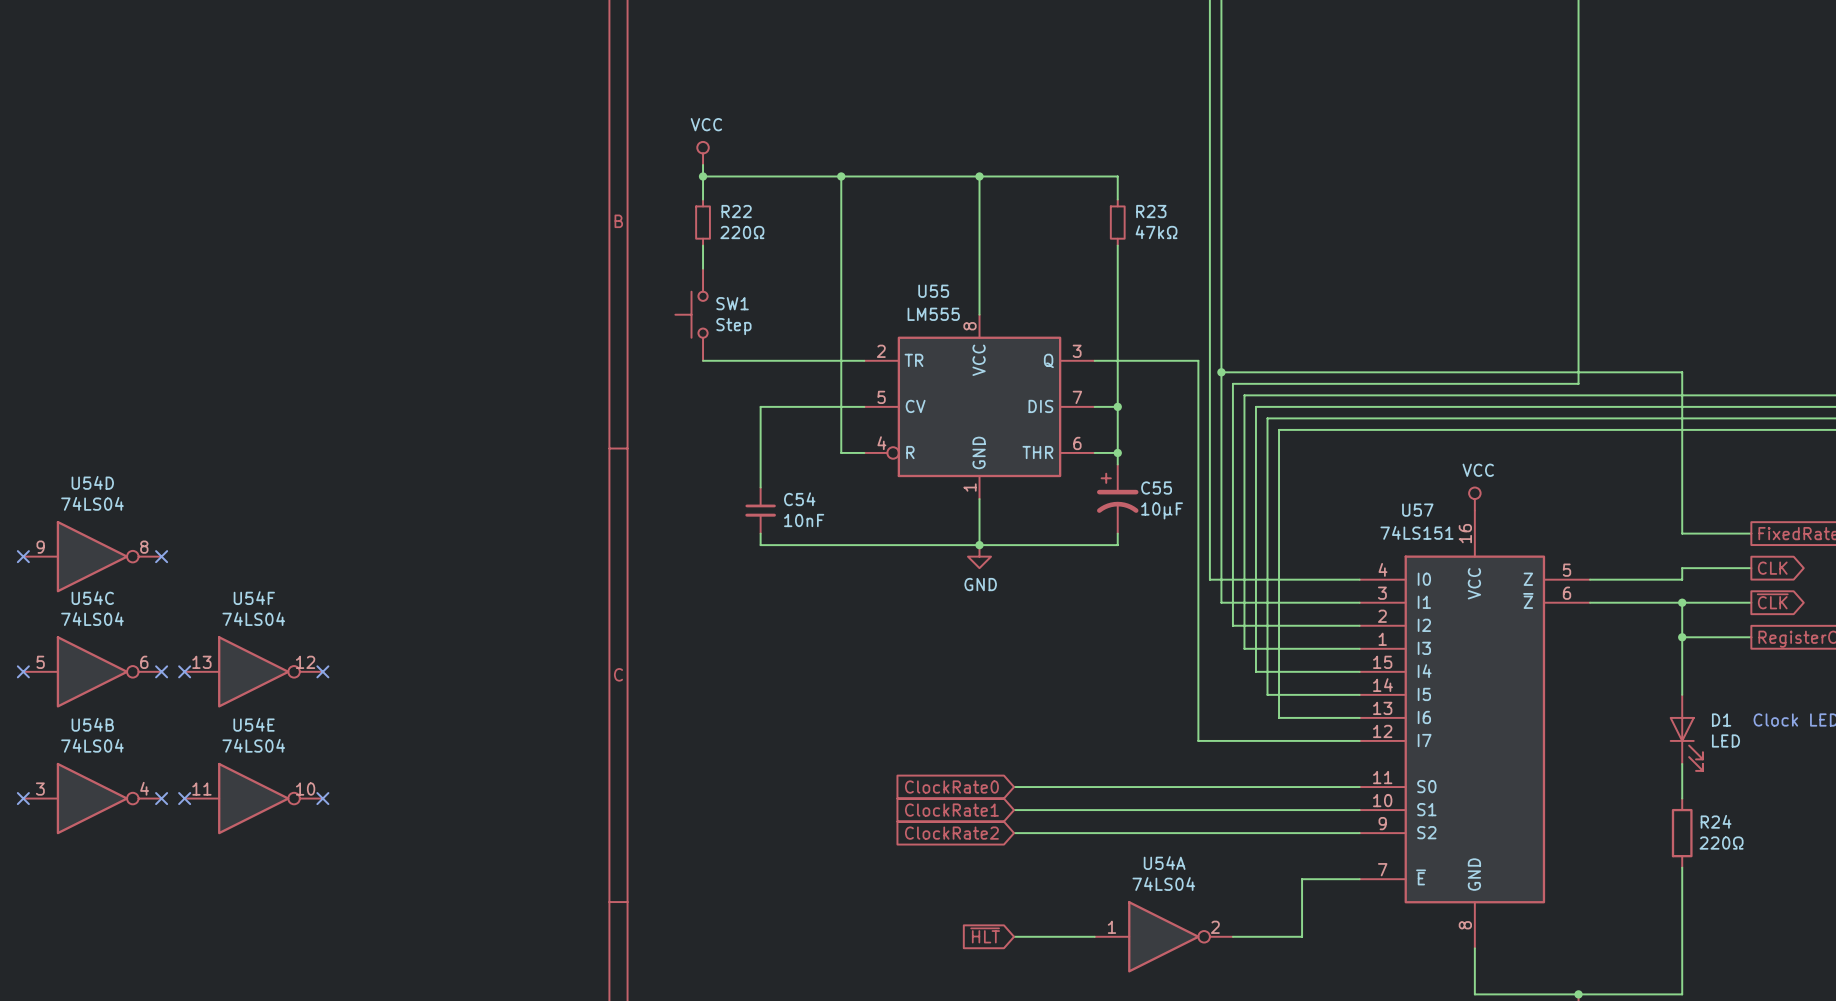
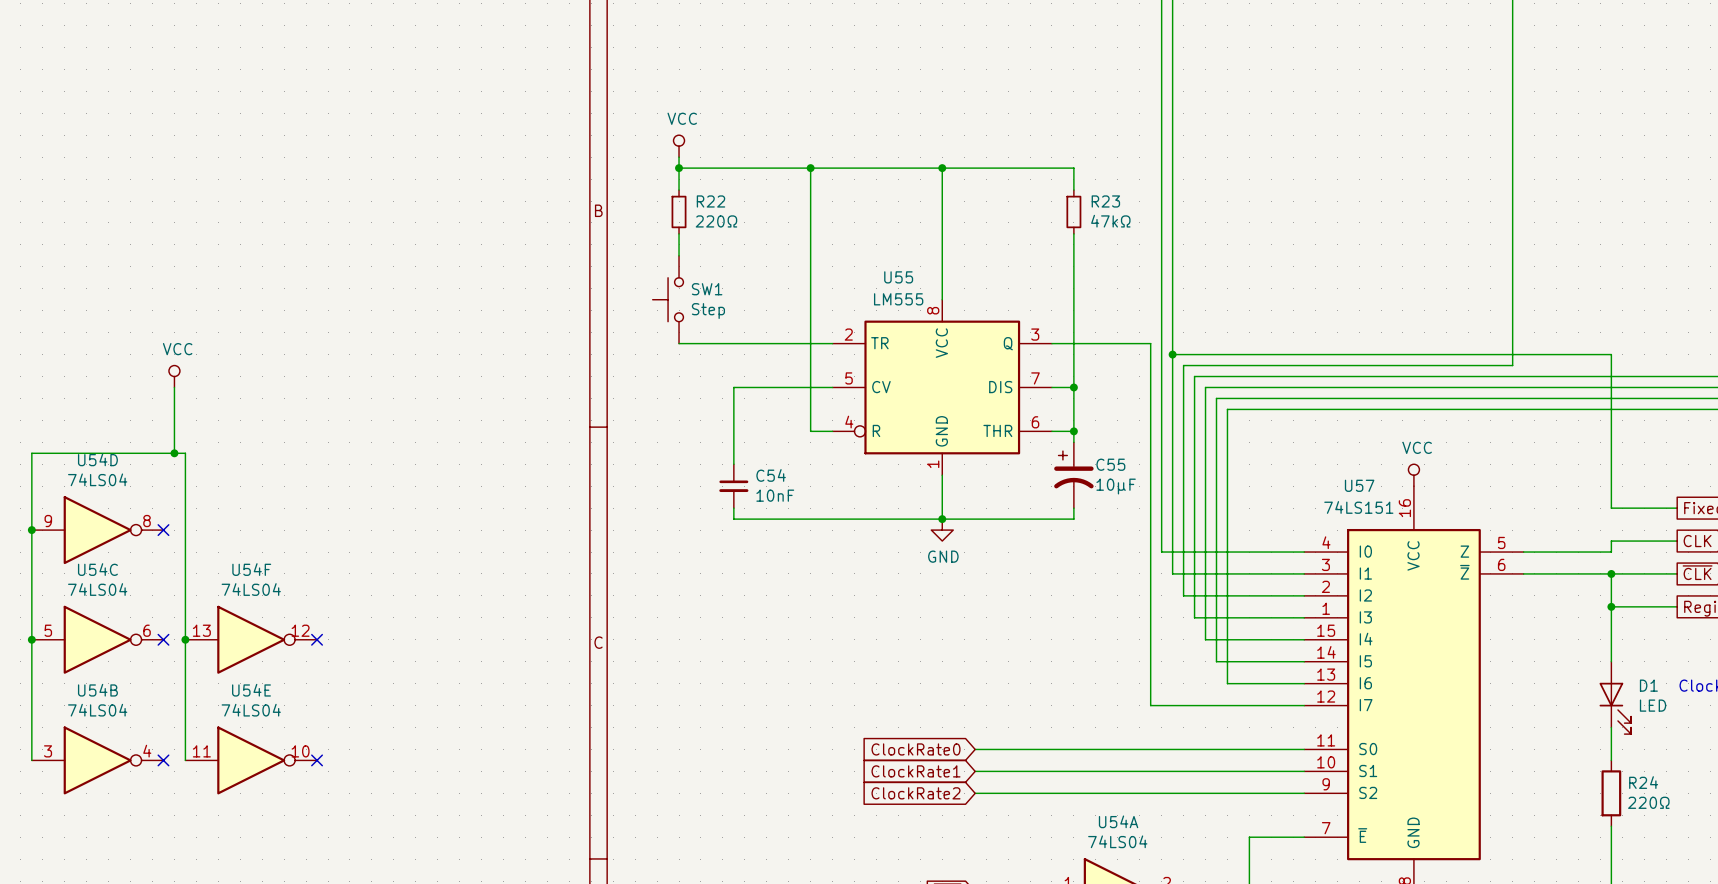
power symbol: none -> VCC (174, 376)
wire: none -> (174, 387) (174, 453)
junction: none -> (174, 453)
no-connect mark: (23, 556) -> none
junction: none -> (31, 530)
no-connect mark: (23, 671) -> none
junction: none -> (31, 639)
no-connect mark: (184, 671) -> none
junction: none -> (185, 639)
wire: none -> (31, 760) (31, 453) (185, 453) (185, 760)
no-connect mark: (23, 798) -> none
no-connect mark: (184, 798) -> none

